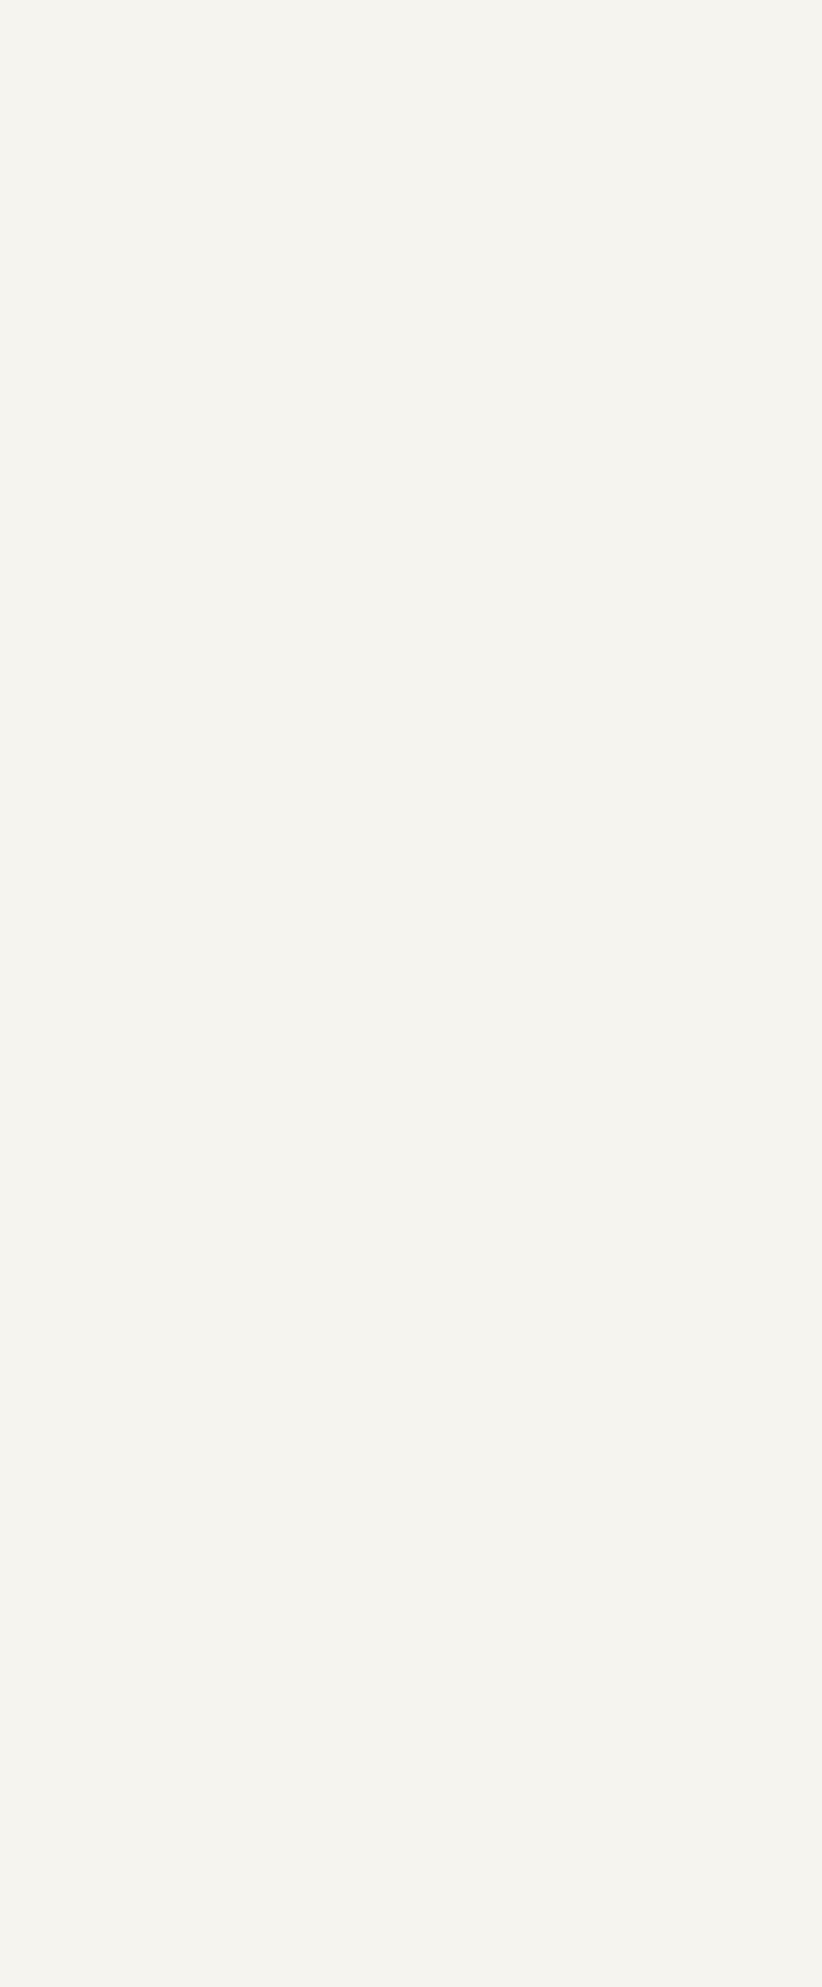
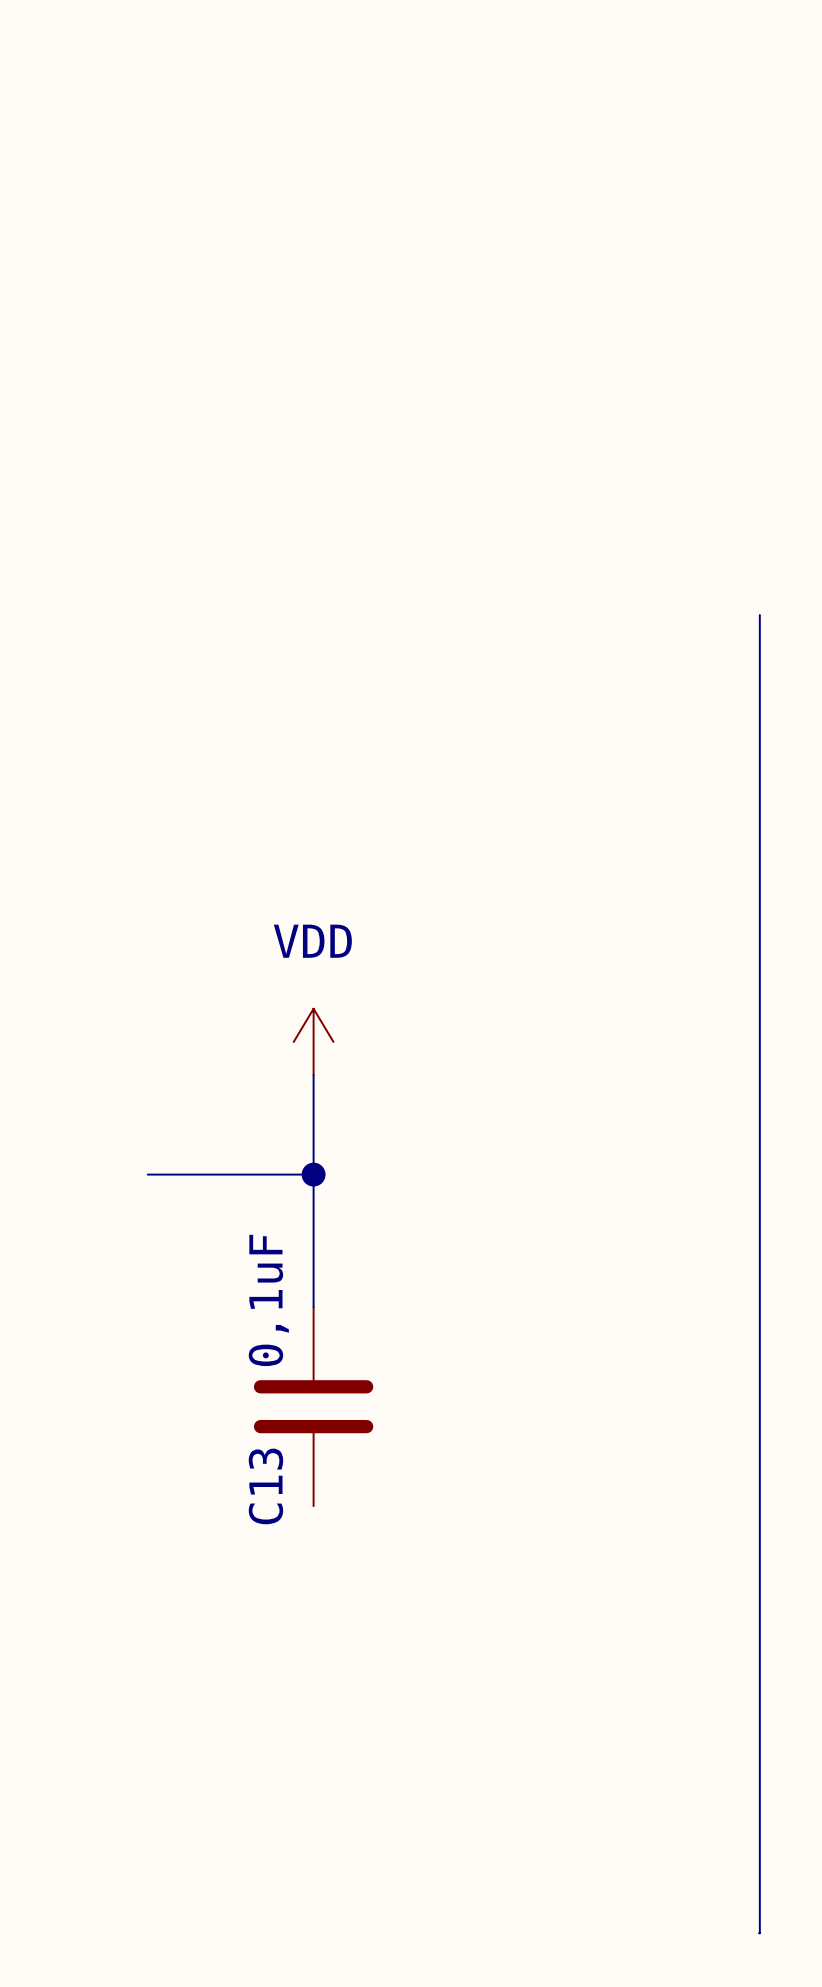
line: none -> (759, 615) (759, 1933)
power symbol: none -> VDD (313, 1041)
wire: none -> (313, 1075) (313, 1307)
wire: none -> (147, 1174) (313, 1174)
junction: none -> (313, 1174)
C13: none -> 0,1uF (313, 1406)

